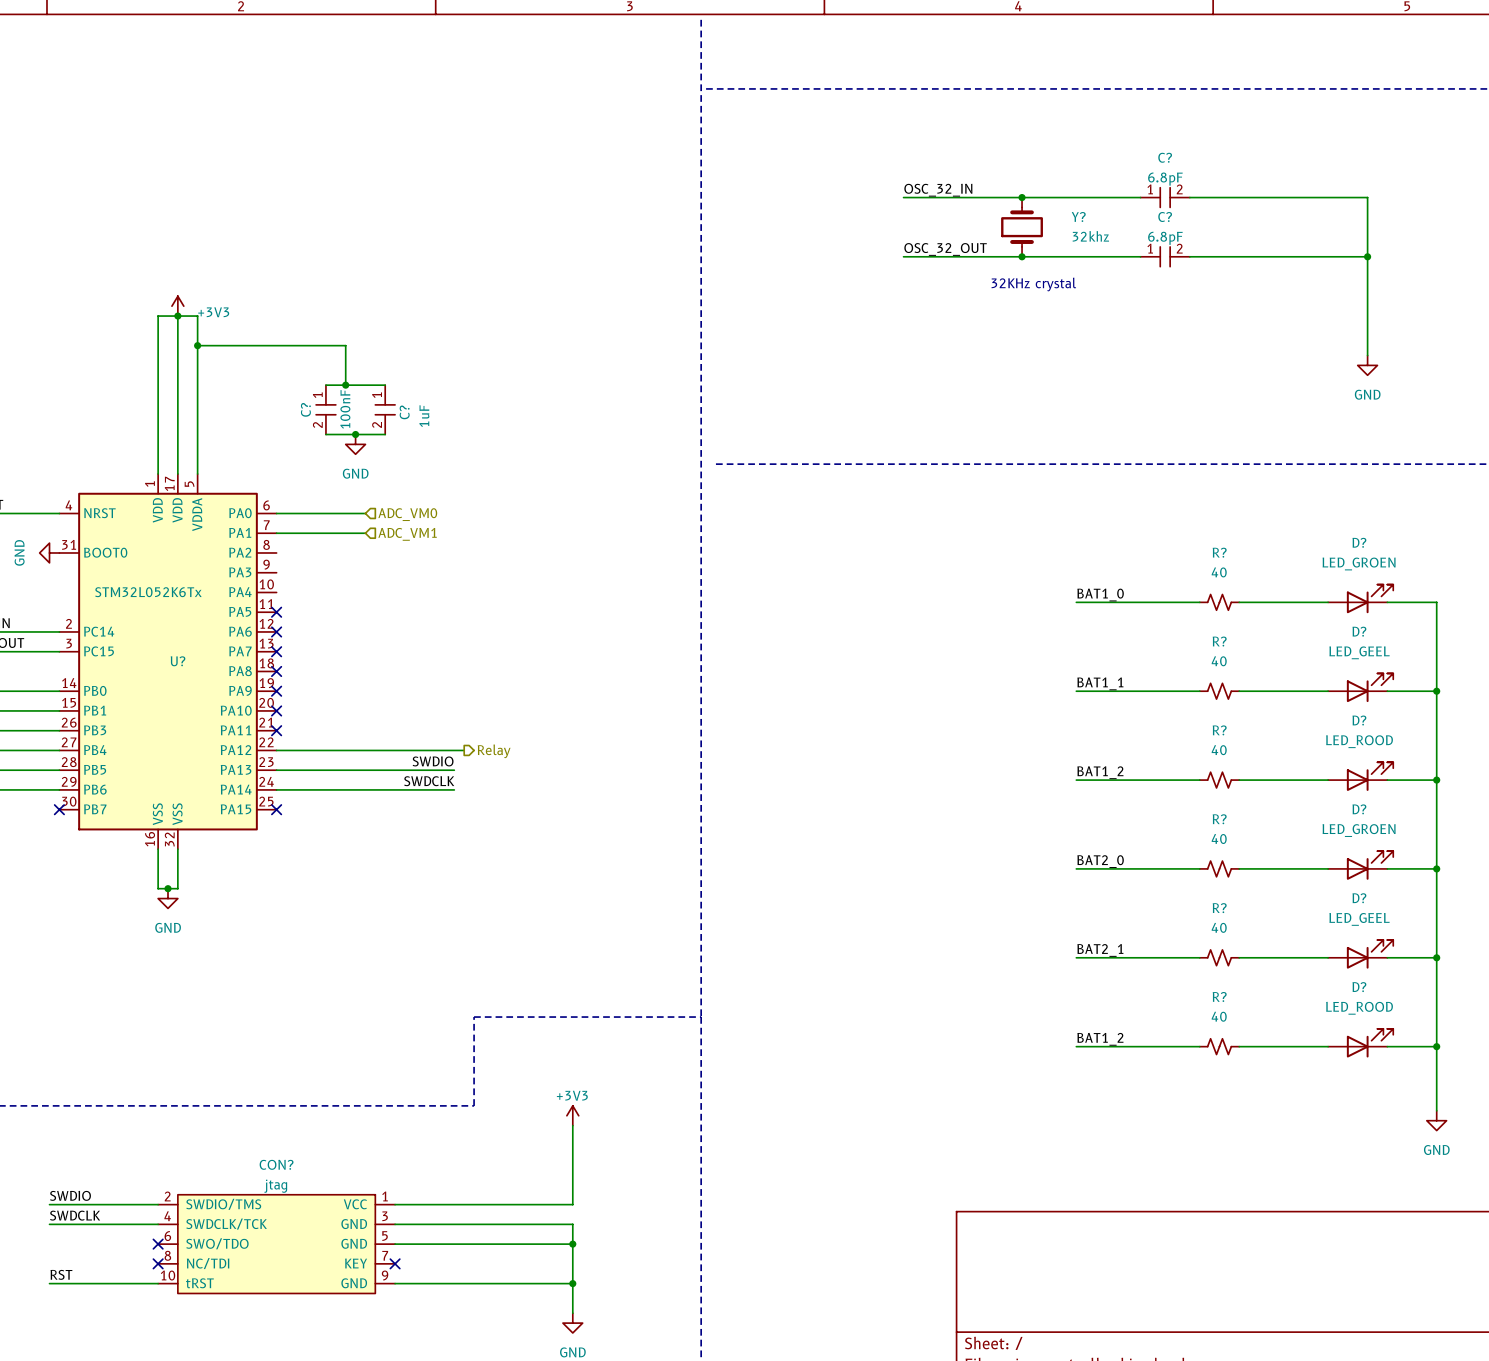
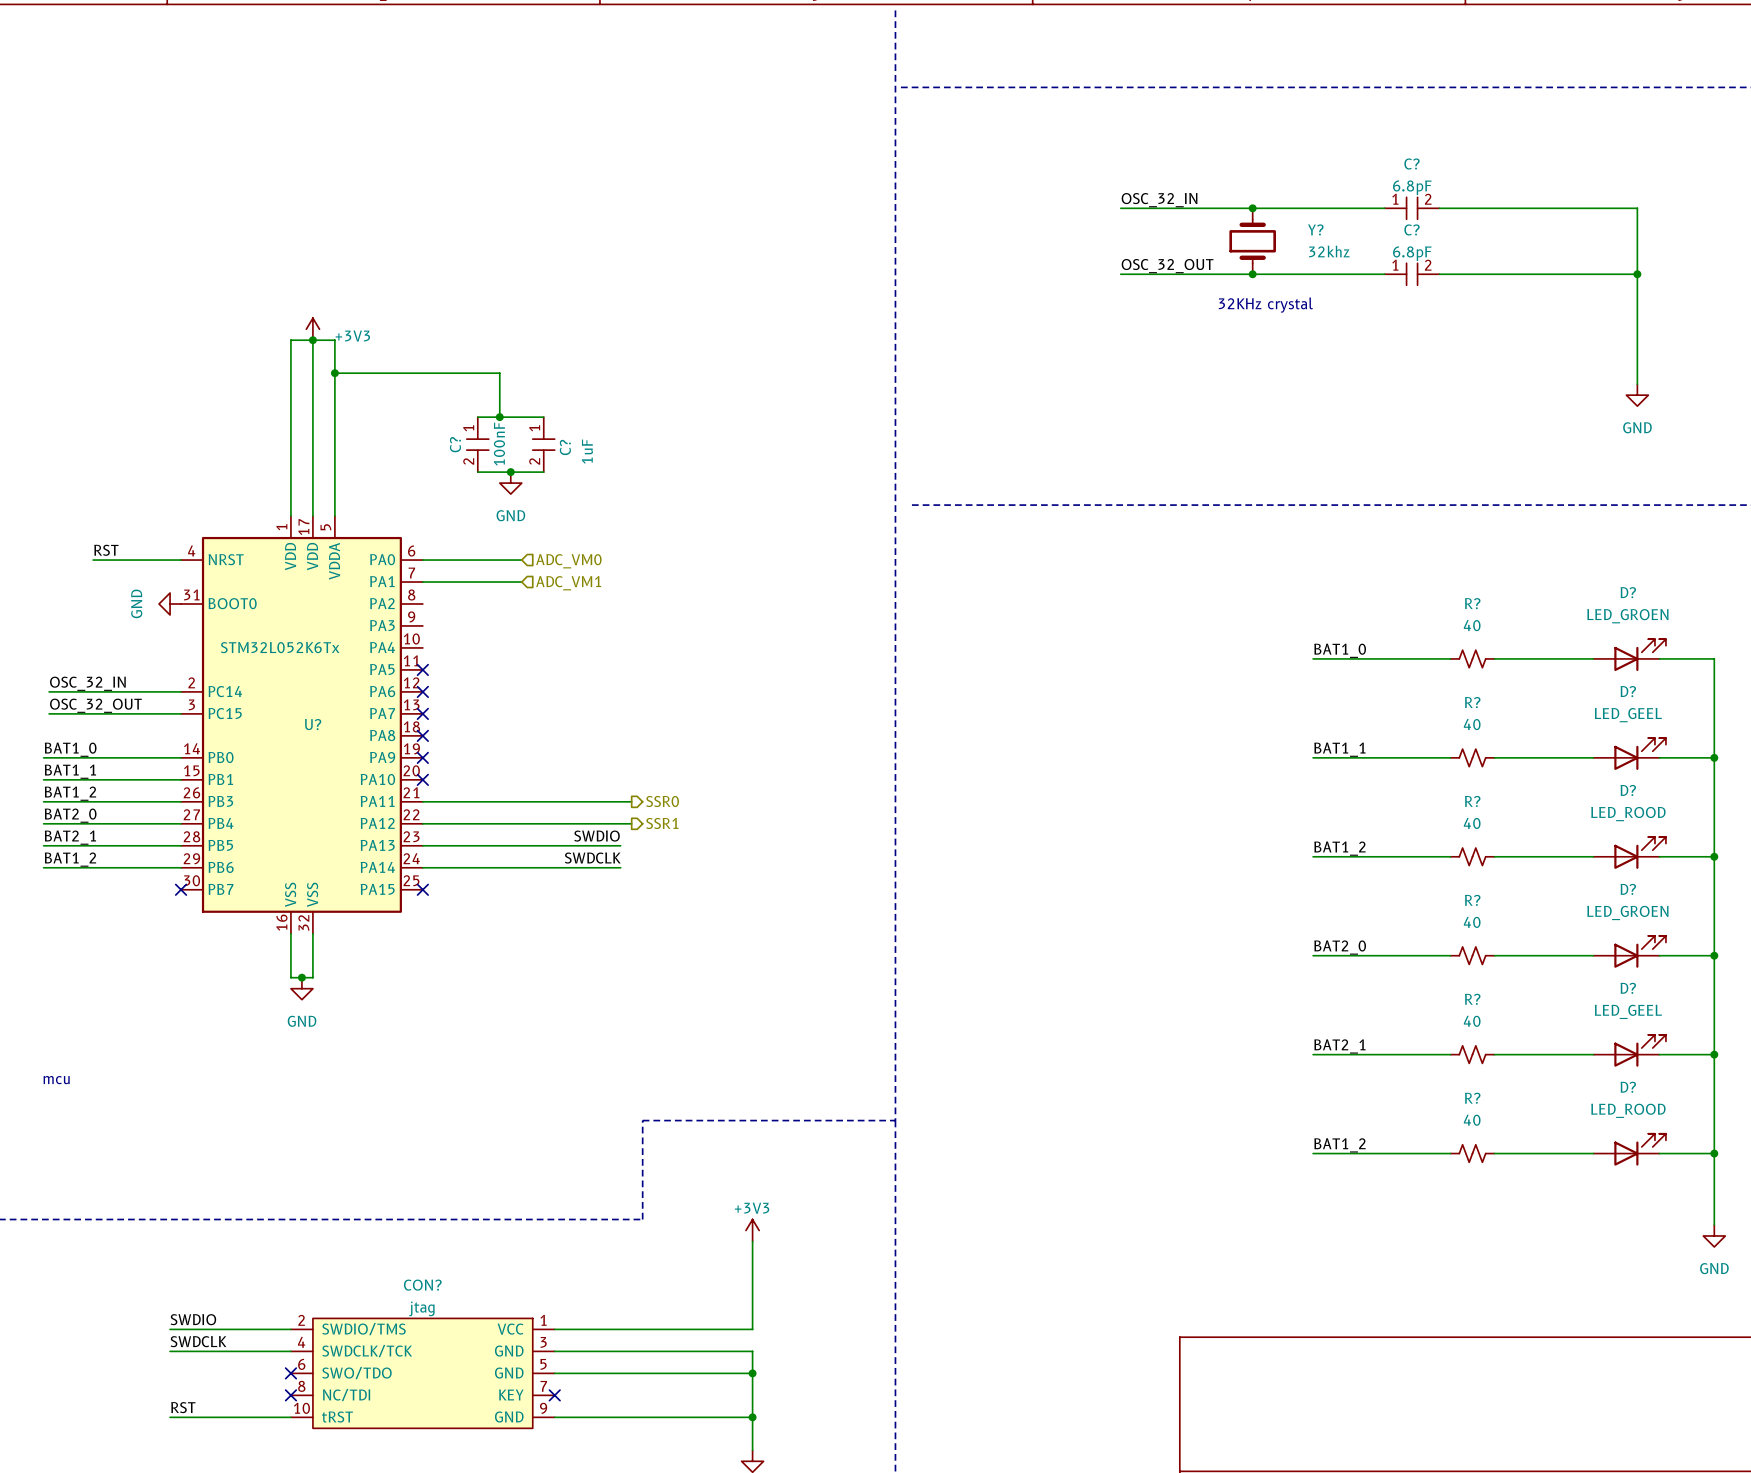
wire: none -> (422, 801) (631, 801)
no-connect mark: (276, 730) -> none
hierarchical label: none -> SSR0 (662, 801)
hierarchical label: Relay (494, 751) -> SSR1 (662, 823)

